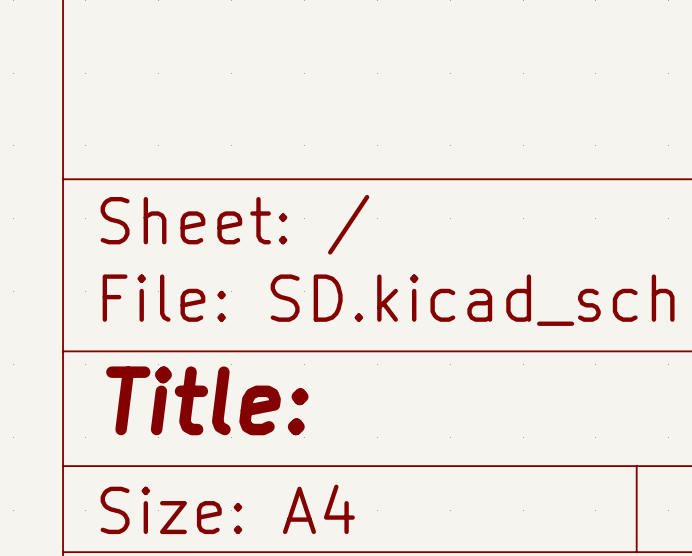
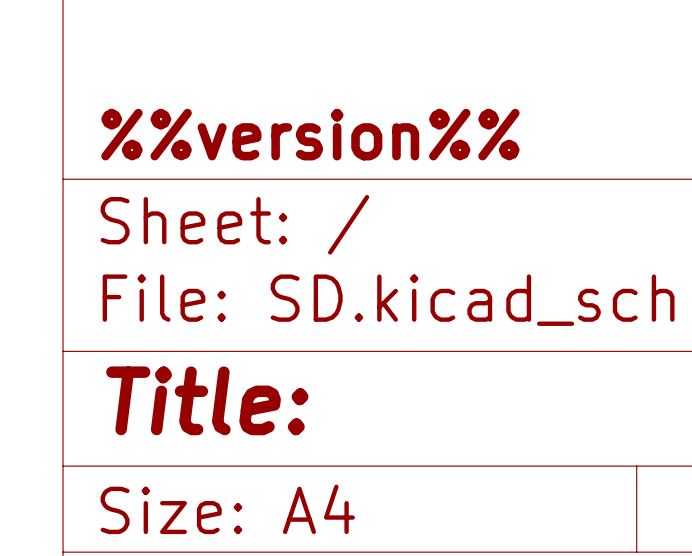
title block: none -> %%version%% (310, 134)

